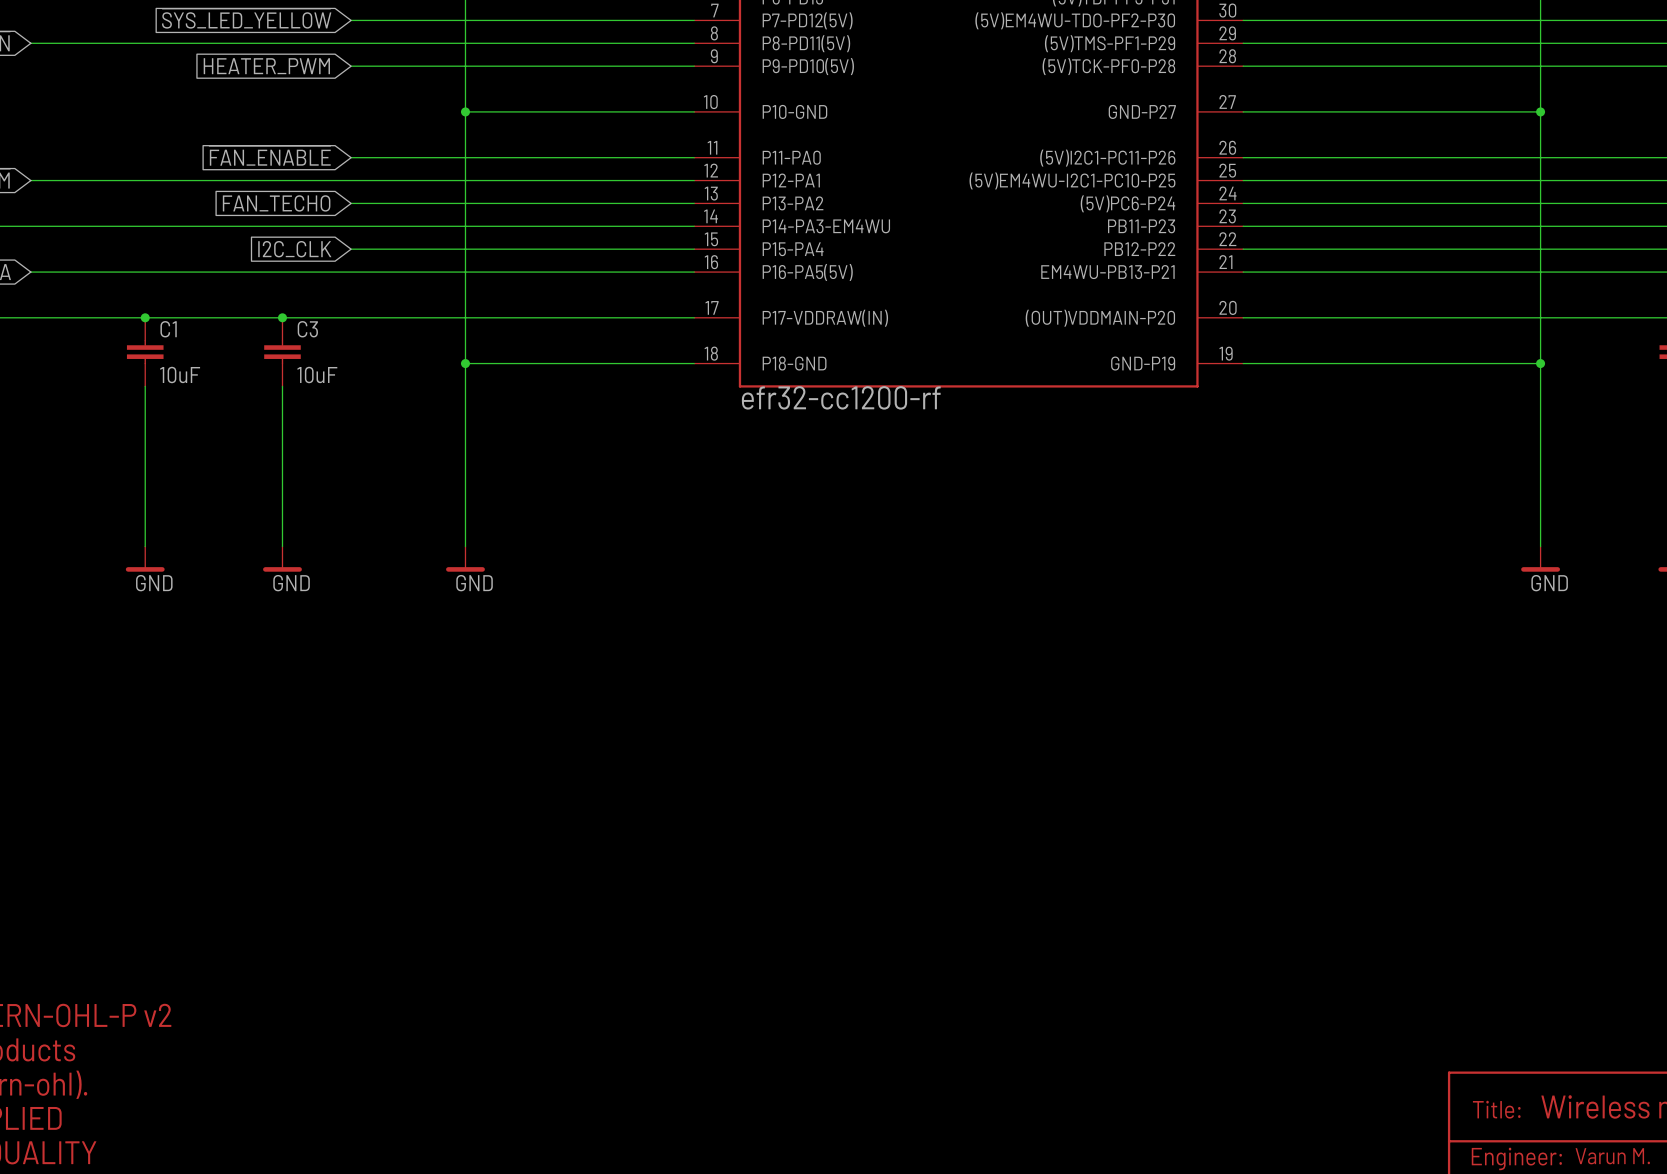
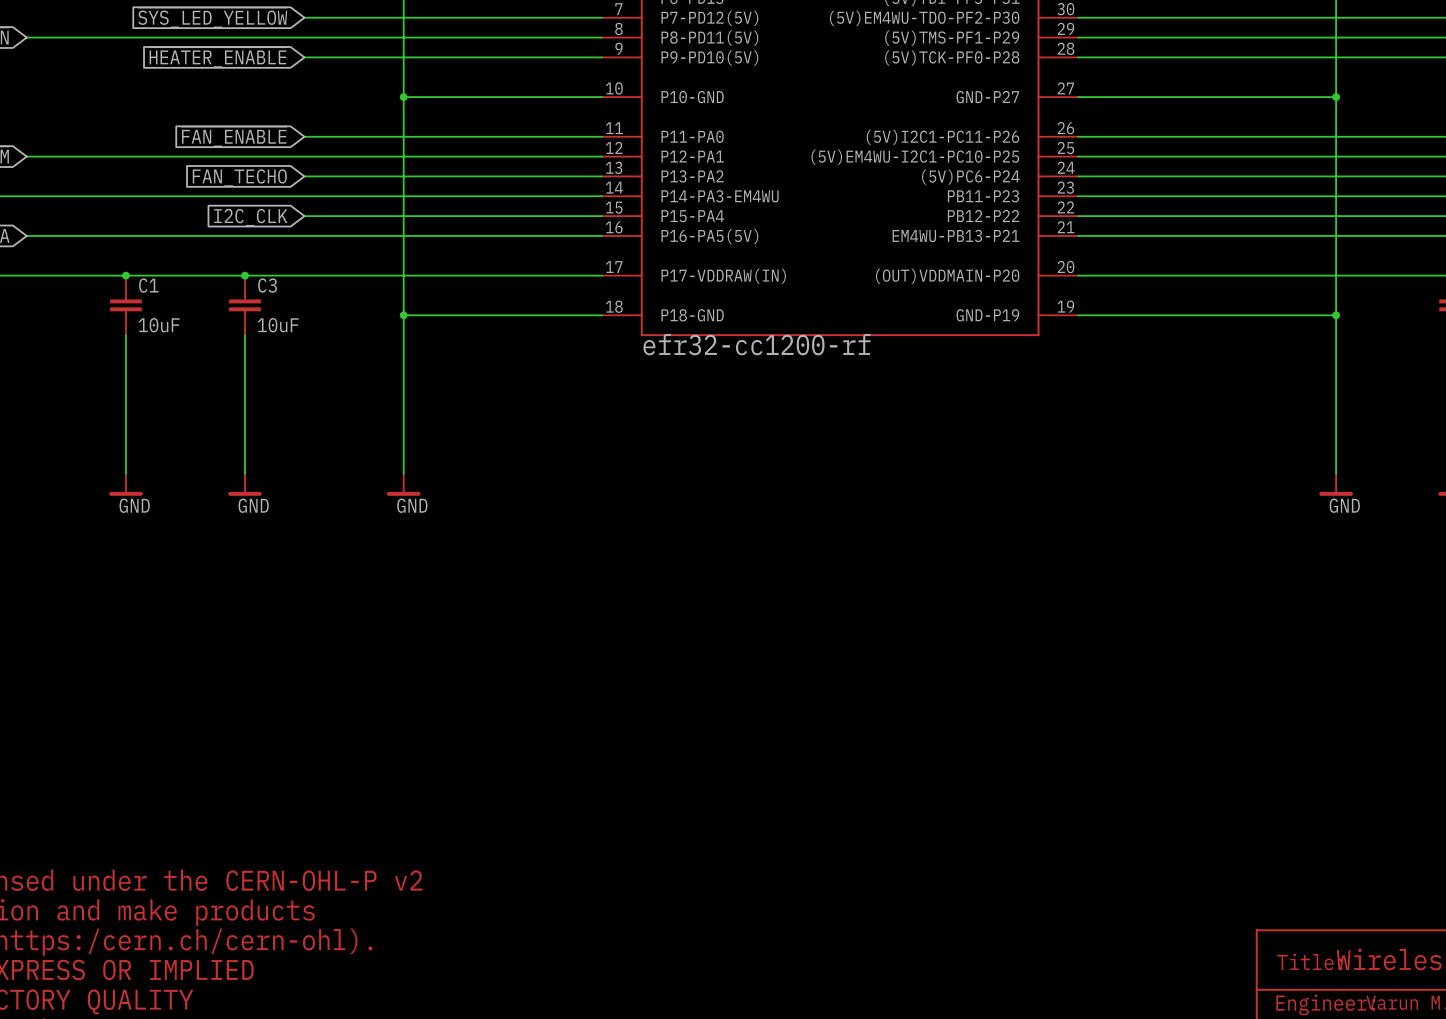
global label: HEATER_PWM (266, 66) -> ~{HEATER_ENABLE} (218, 57)

